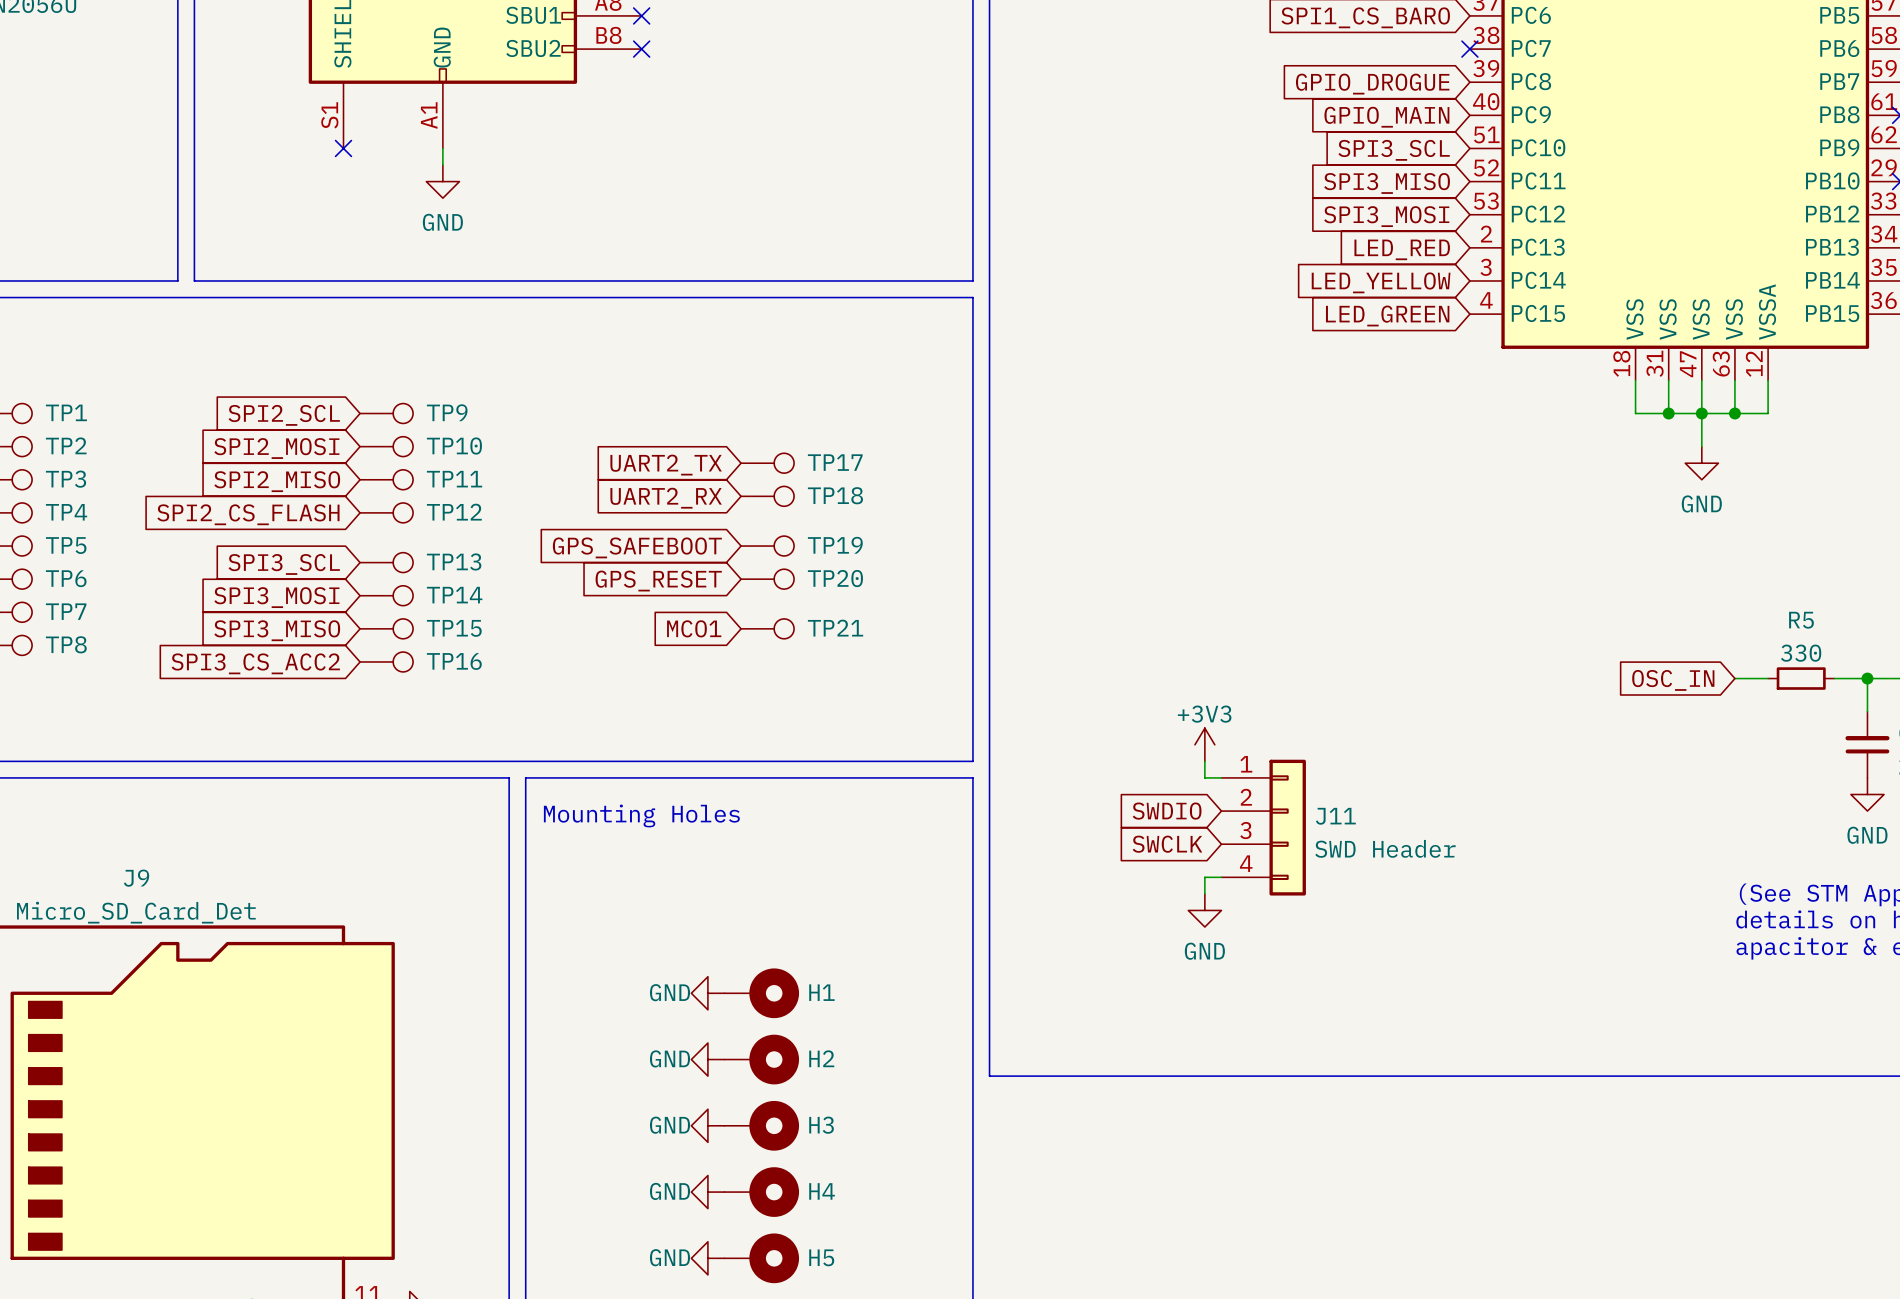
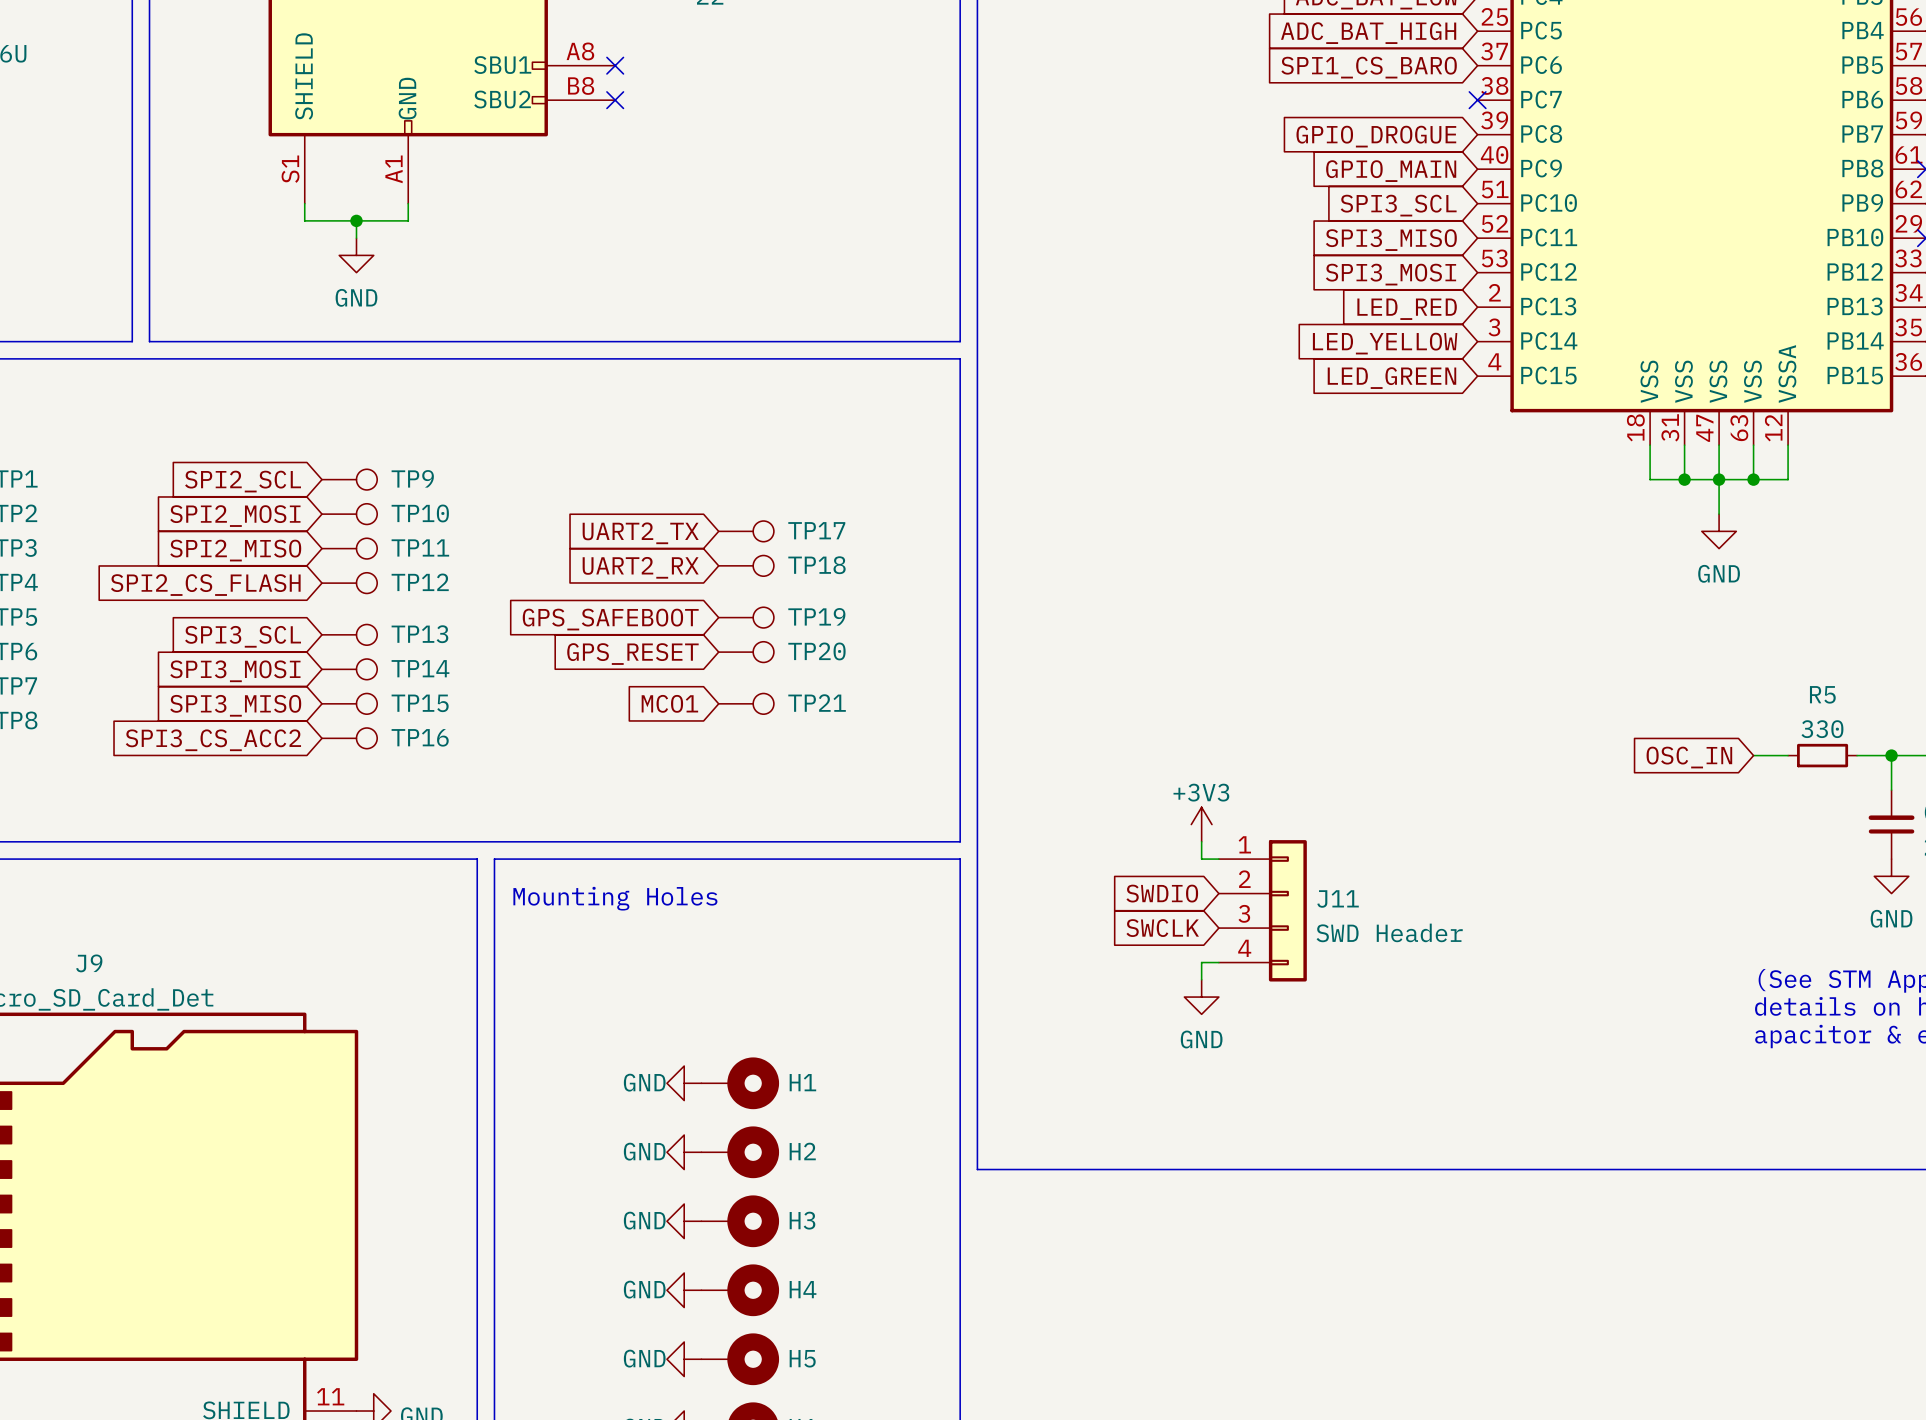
wire: none -> (304, 203) (304, 220) (408, 220)
no-connect mark: (343, 148) -> none
wire: none -> (356, 220) (356, 238)
junction: none -> (356, 220)
power symbol position: GND (442, 181) -> GND (356, 255)

